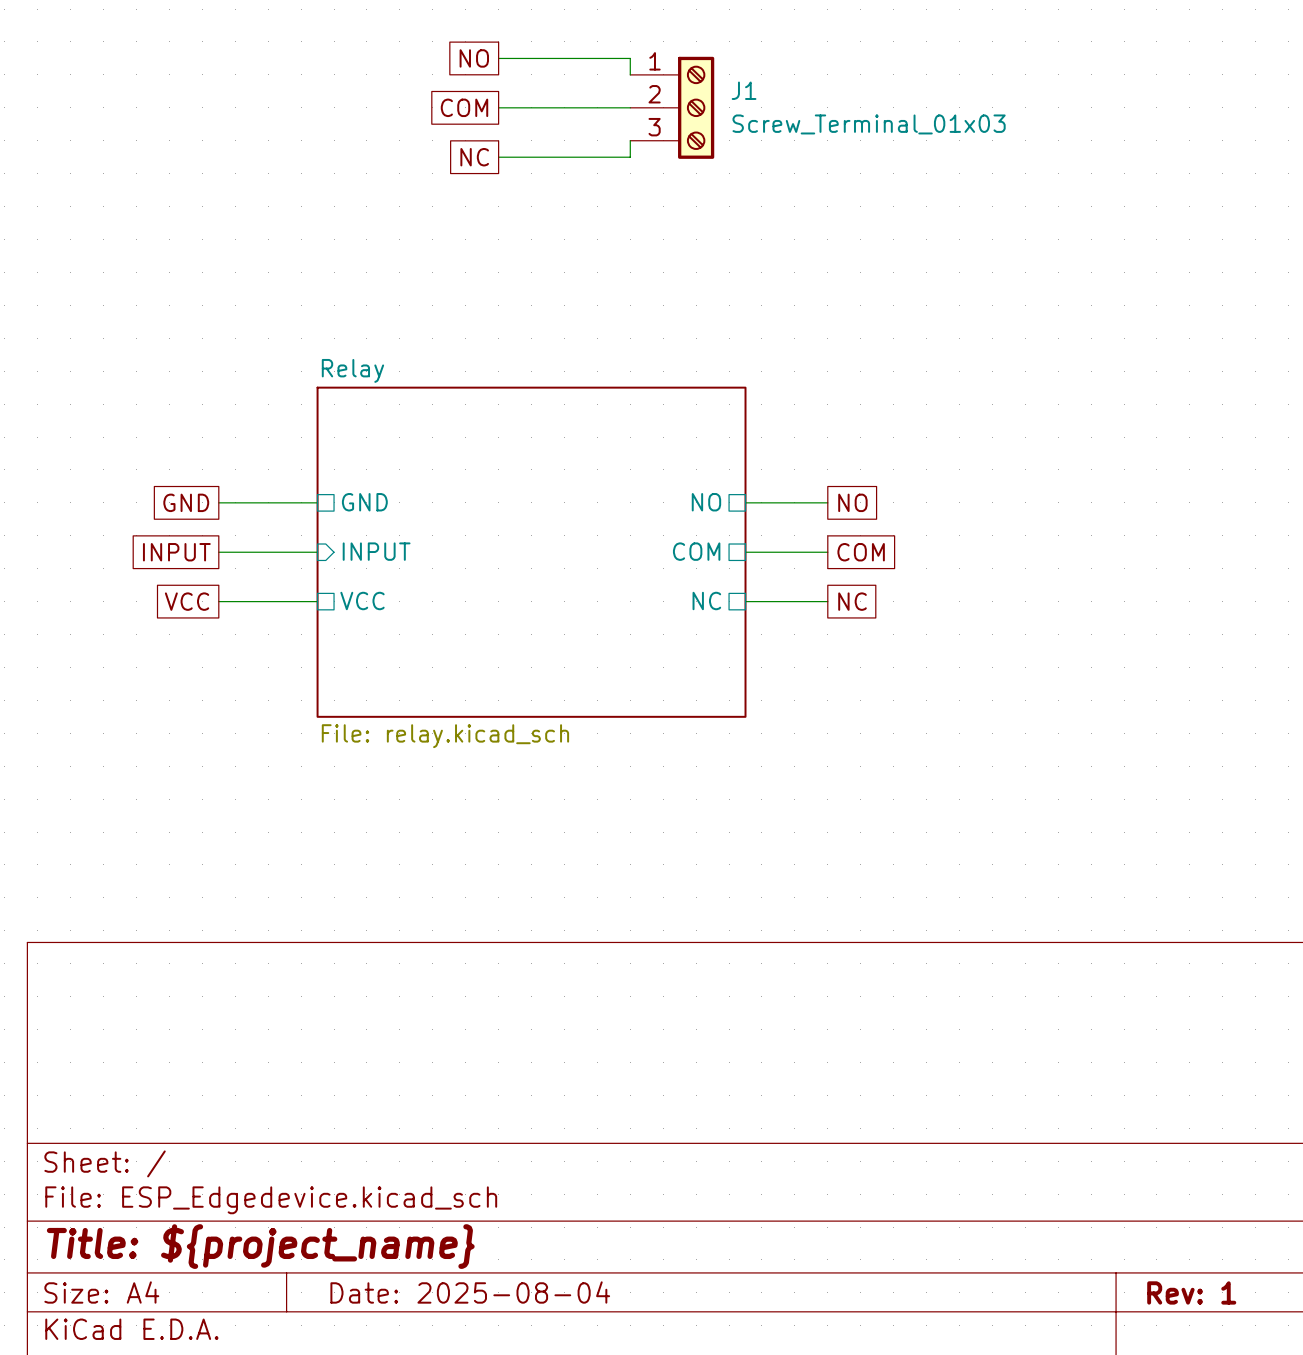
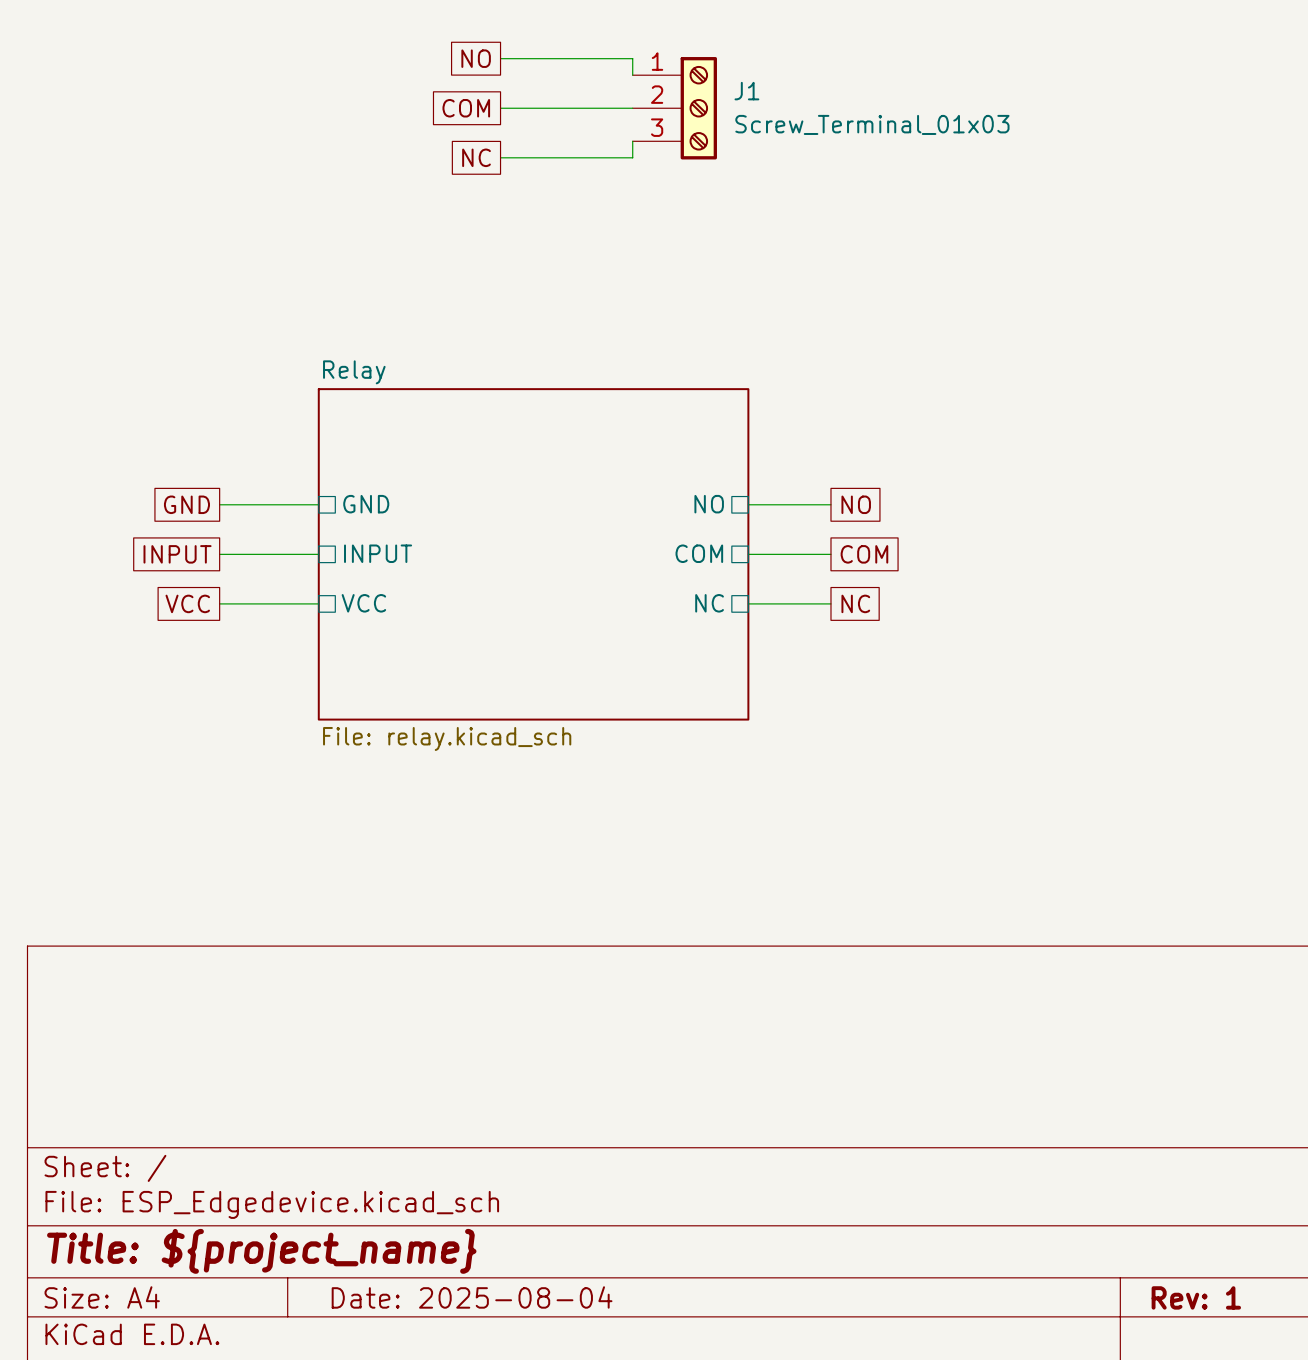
sheet pin shape: input (376, 551) -> passive (378, 553)

